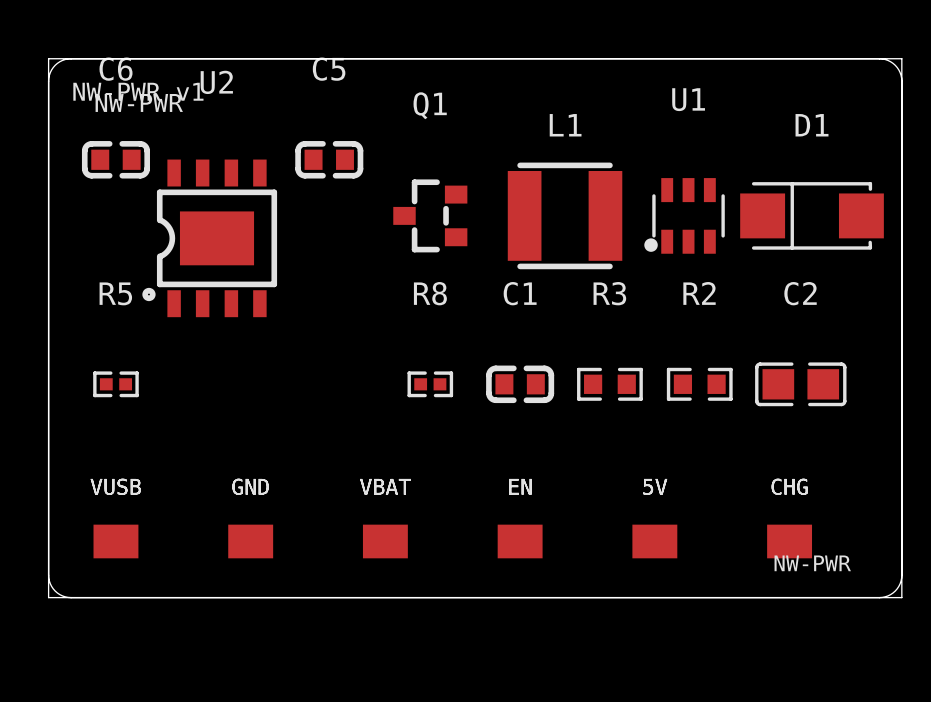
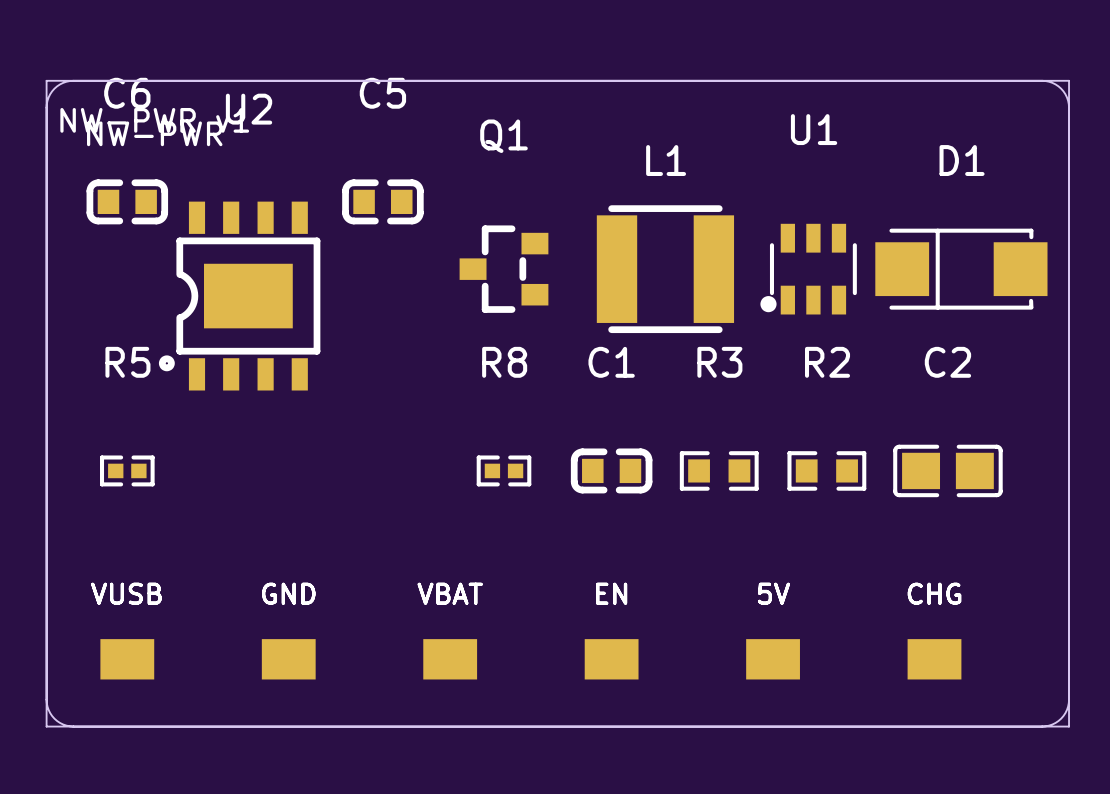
text: NW-PWR (812, 563) -> none

